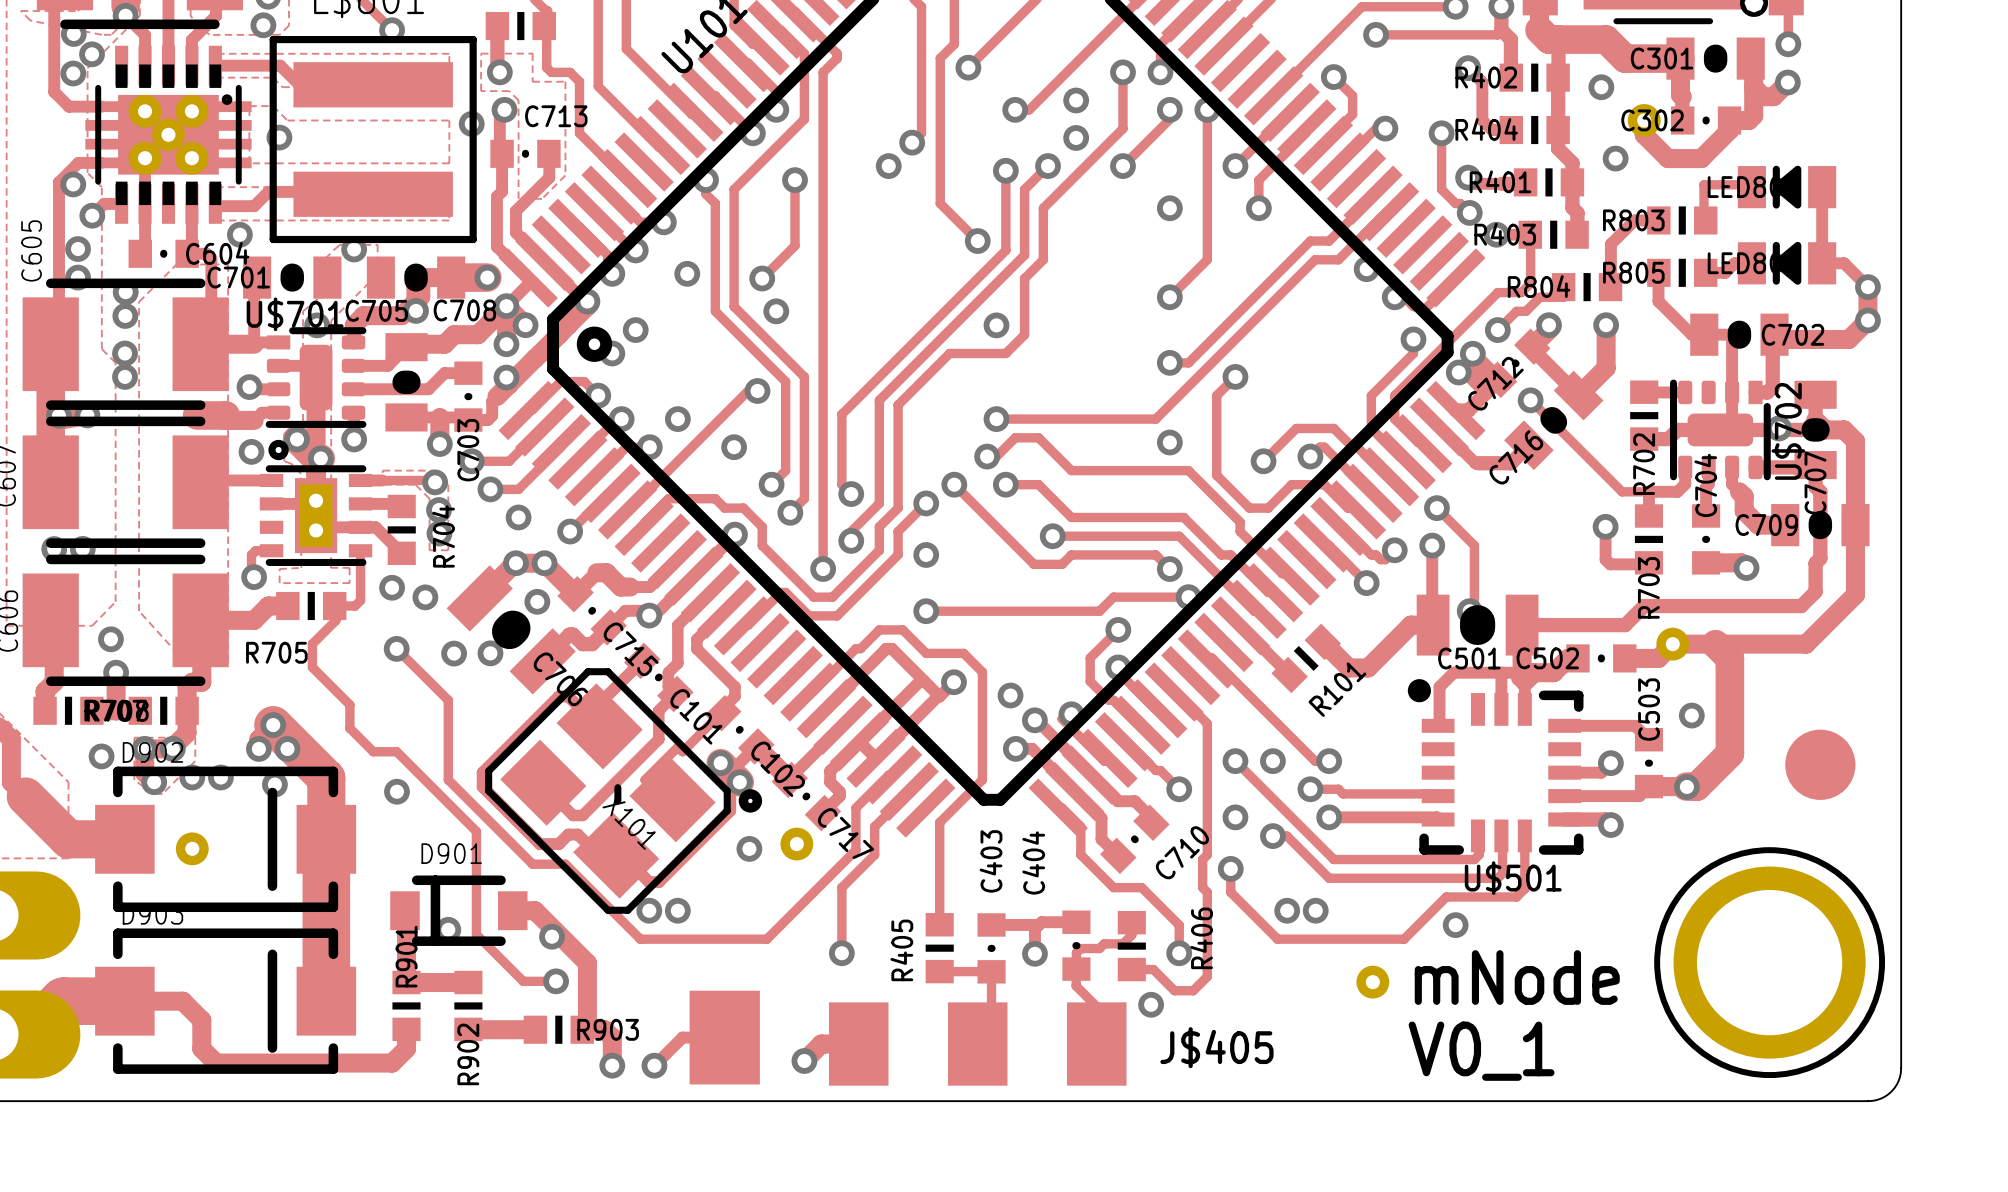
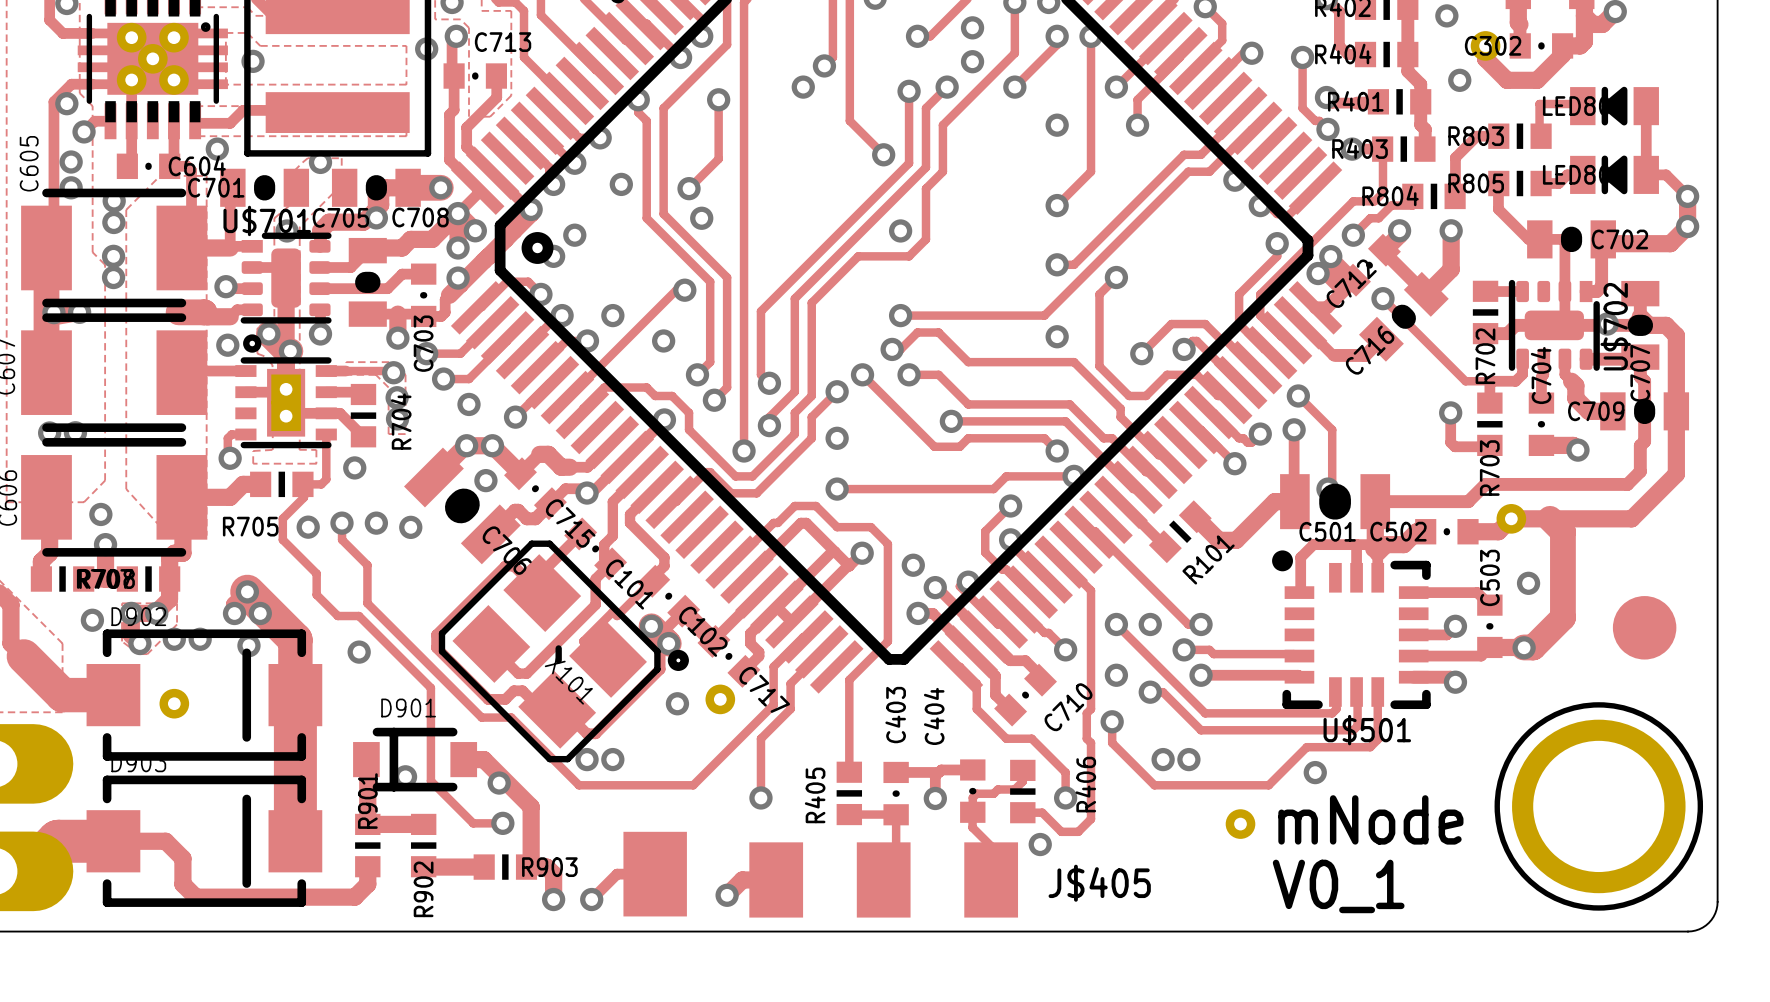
via: (425, 597) -> none
via: none -> (341, 523)
track: (396, 648) (448, 700) (448, 779) -> (341, 523) (342, 539) (367, 565) (367, 603) (405, 641)
via: (396, 648) -> none
via: none -> (376, 523)
via: none -> (308, 527)
via: (490, 653) -> none

